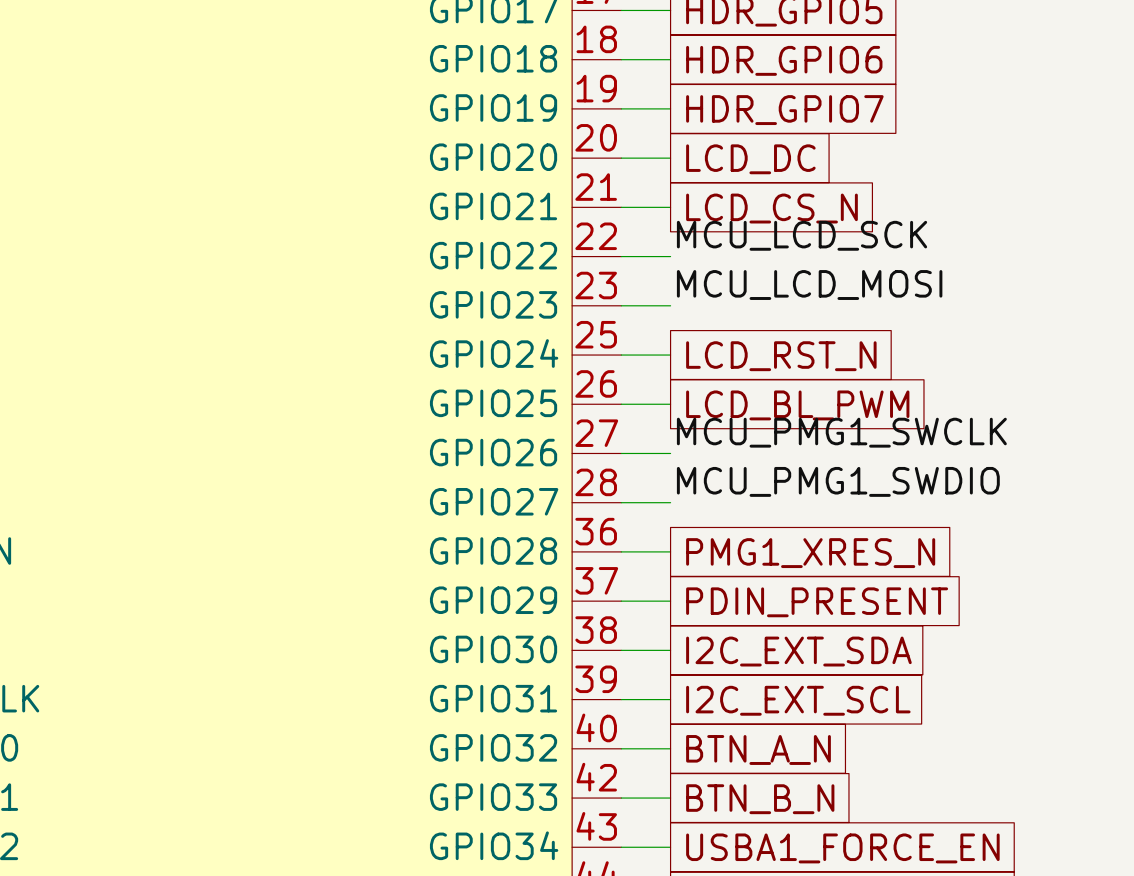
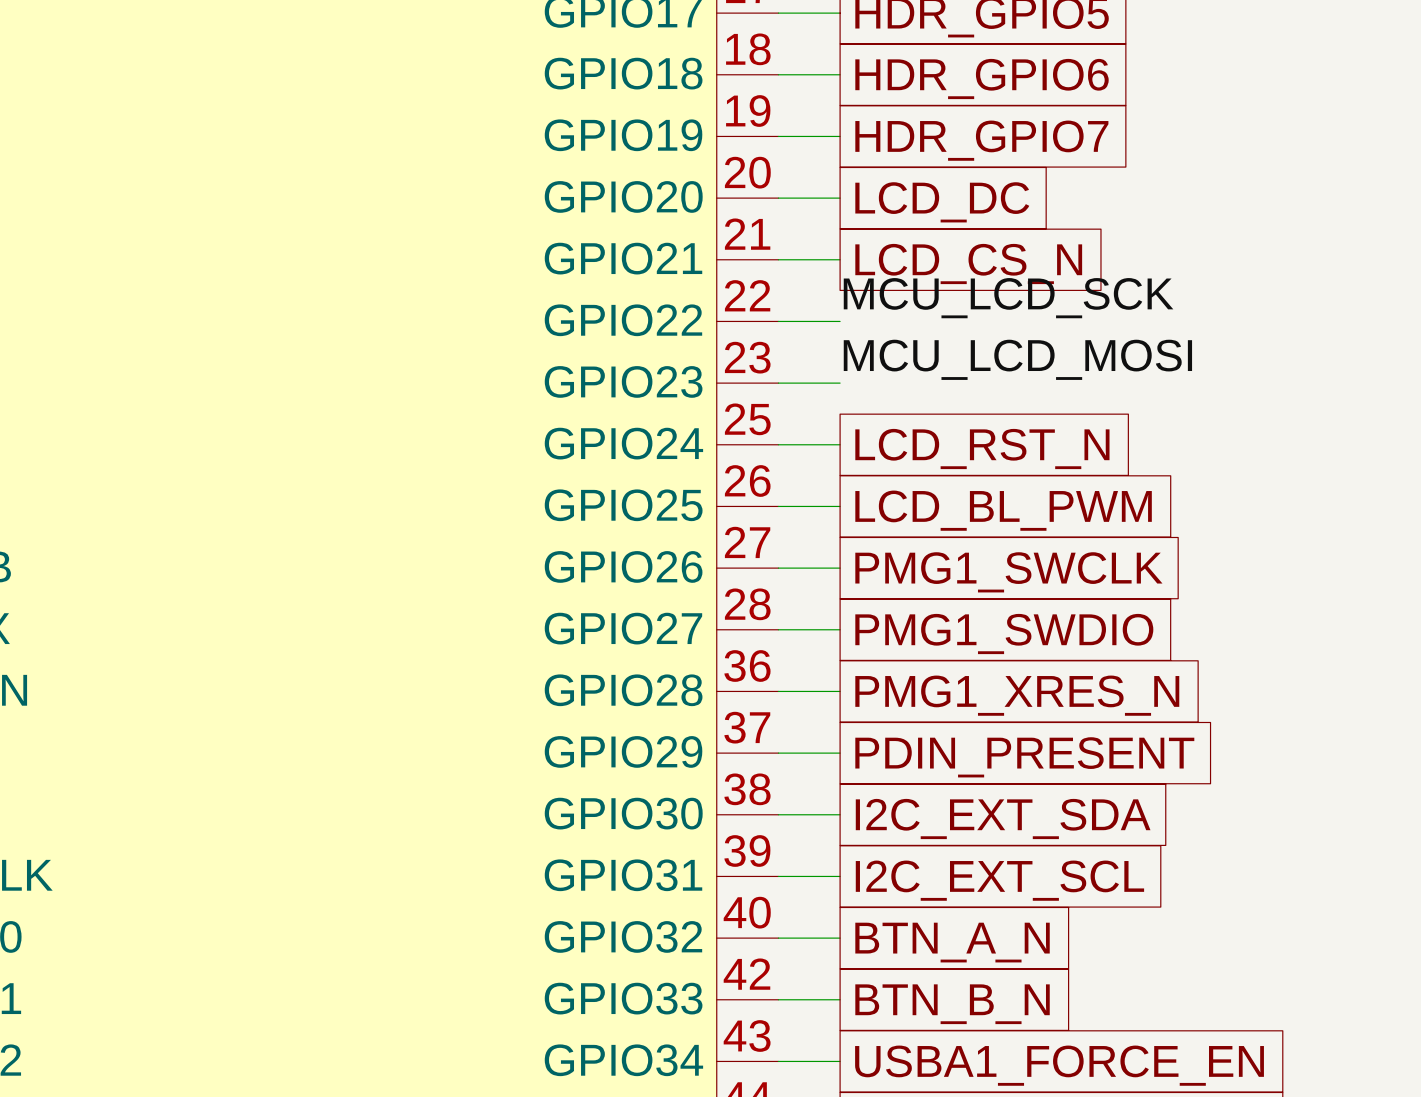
label: MCU_PMG1_SWCLK (841, 432) -> none
global label: none -> PMG1_SWCLK (1008, 572)
label: MCU_PMG1_SWDIO (838, 481) -> none
global label: none -> PMG1_SWDIO (1004, 634)

